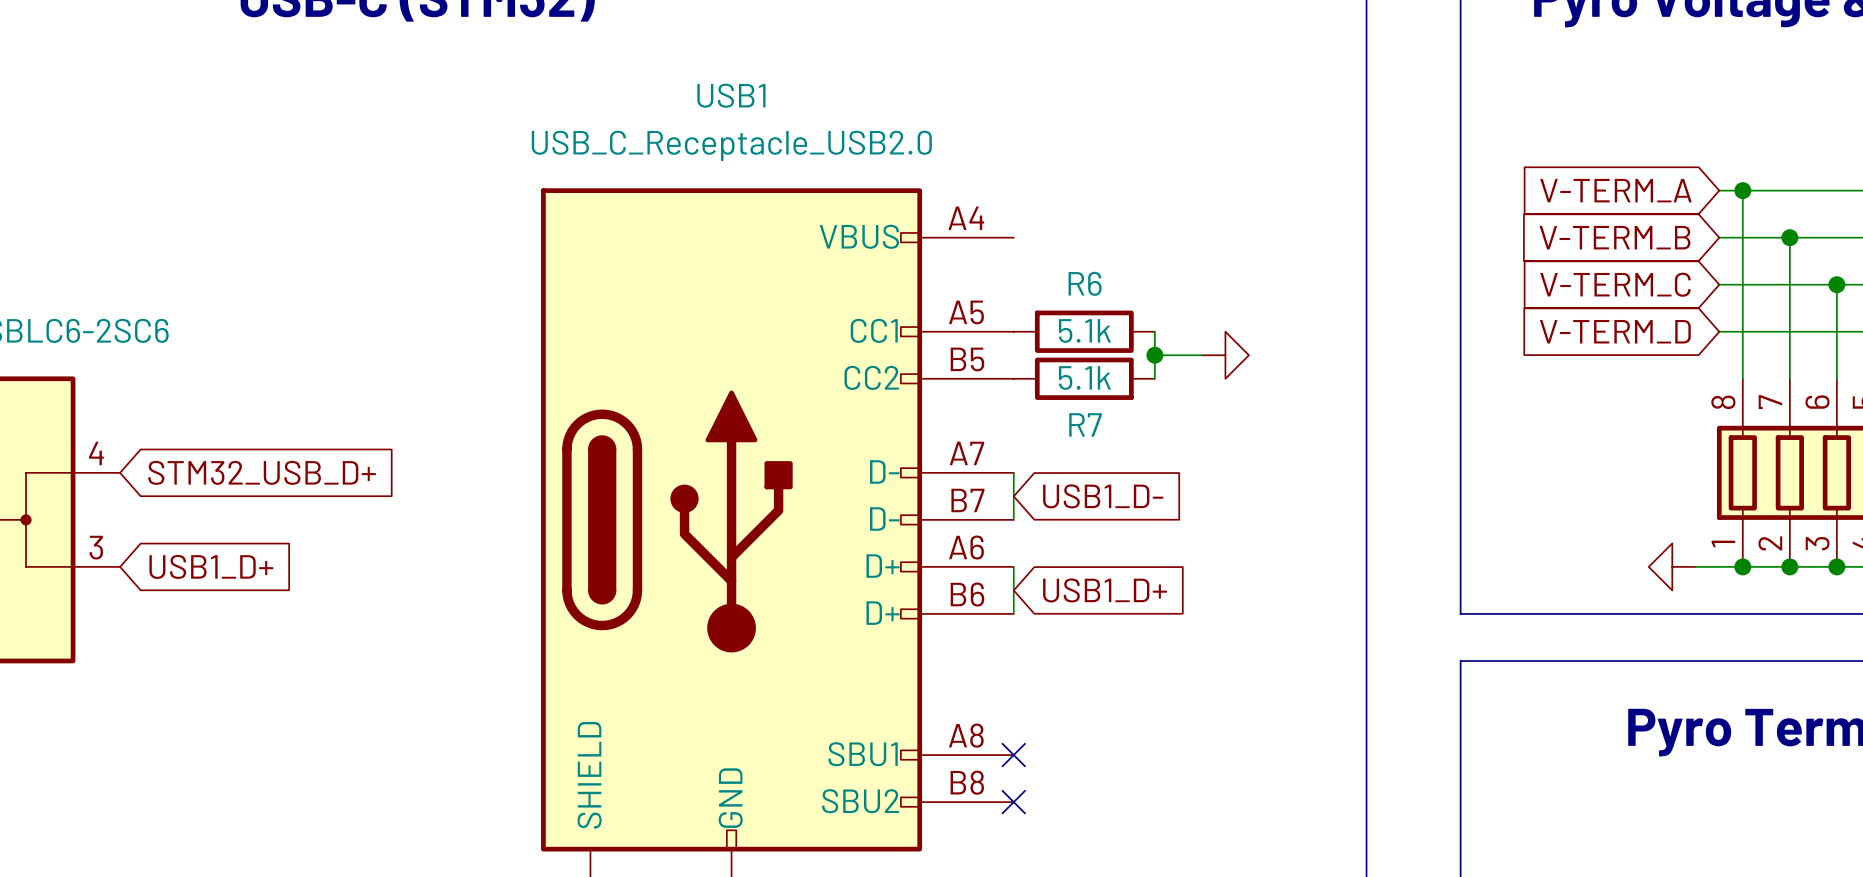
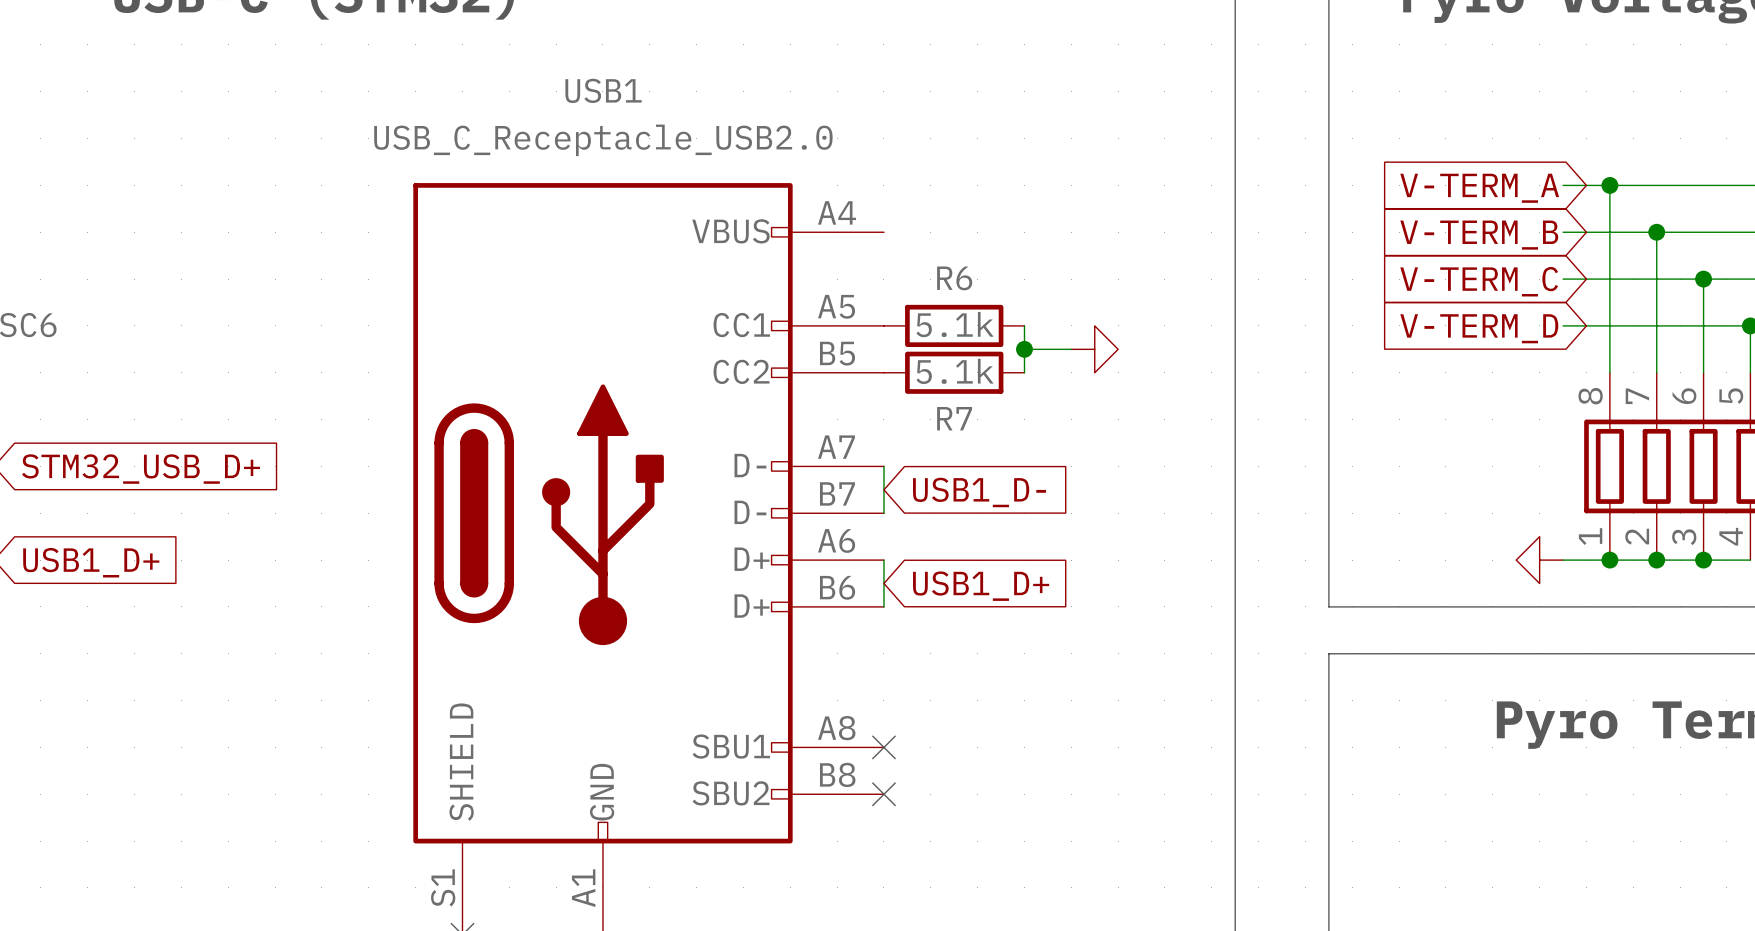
wire: none -> (1563, 185) (1586, 185)
wire: none -> (1563, 232) (1586, 232)
wire: none -> (1563, 279) (1586, 279)
wire: none -> (1563, 325) (1586, 325)

